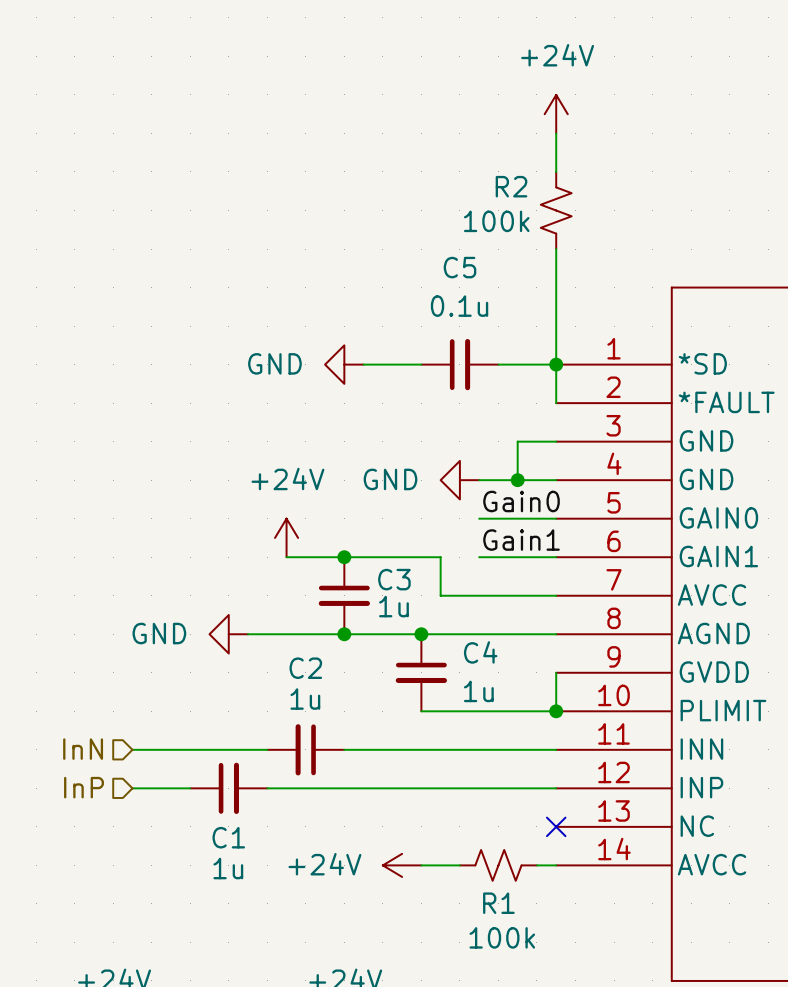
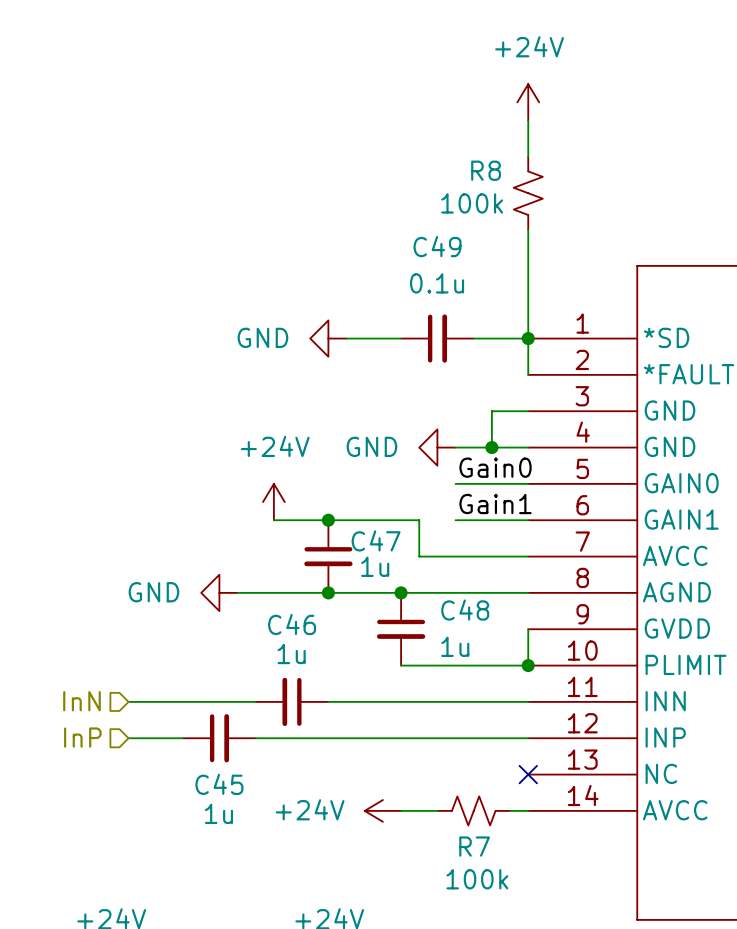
R2 name: R2 (511, 186) -> R8 (486, 170)
C5 name: C5 (460, 267) -> C49 (437, 246)
C3 name: C3 (394, 579) -> C47 (376, 540)
C4 name: C4 (480, 652) -> C48 (465, 610)
C2 name: C2 (305, 668) -> C46 (292, 624)
C1 name: C1 (228, 837) -> C45 (219, 784)
R1 name: R1 (498, 903) -> R7 (474, 846)

